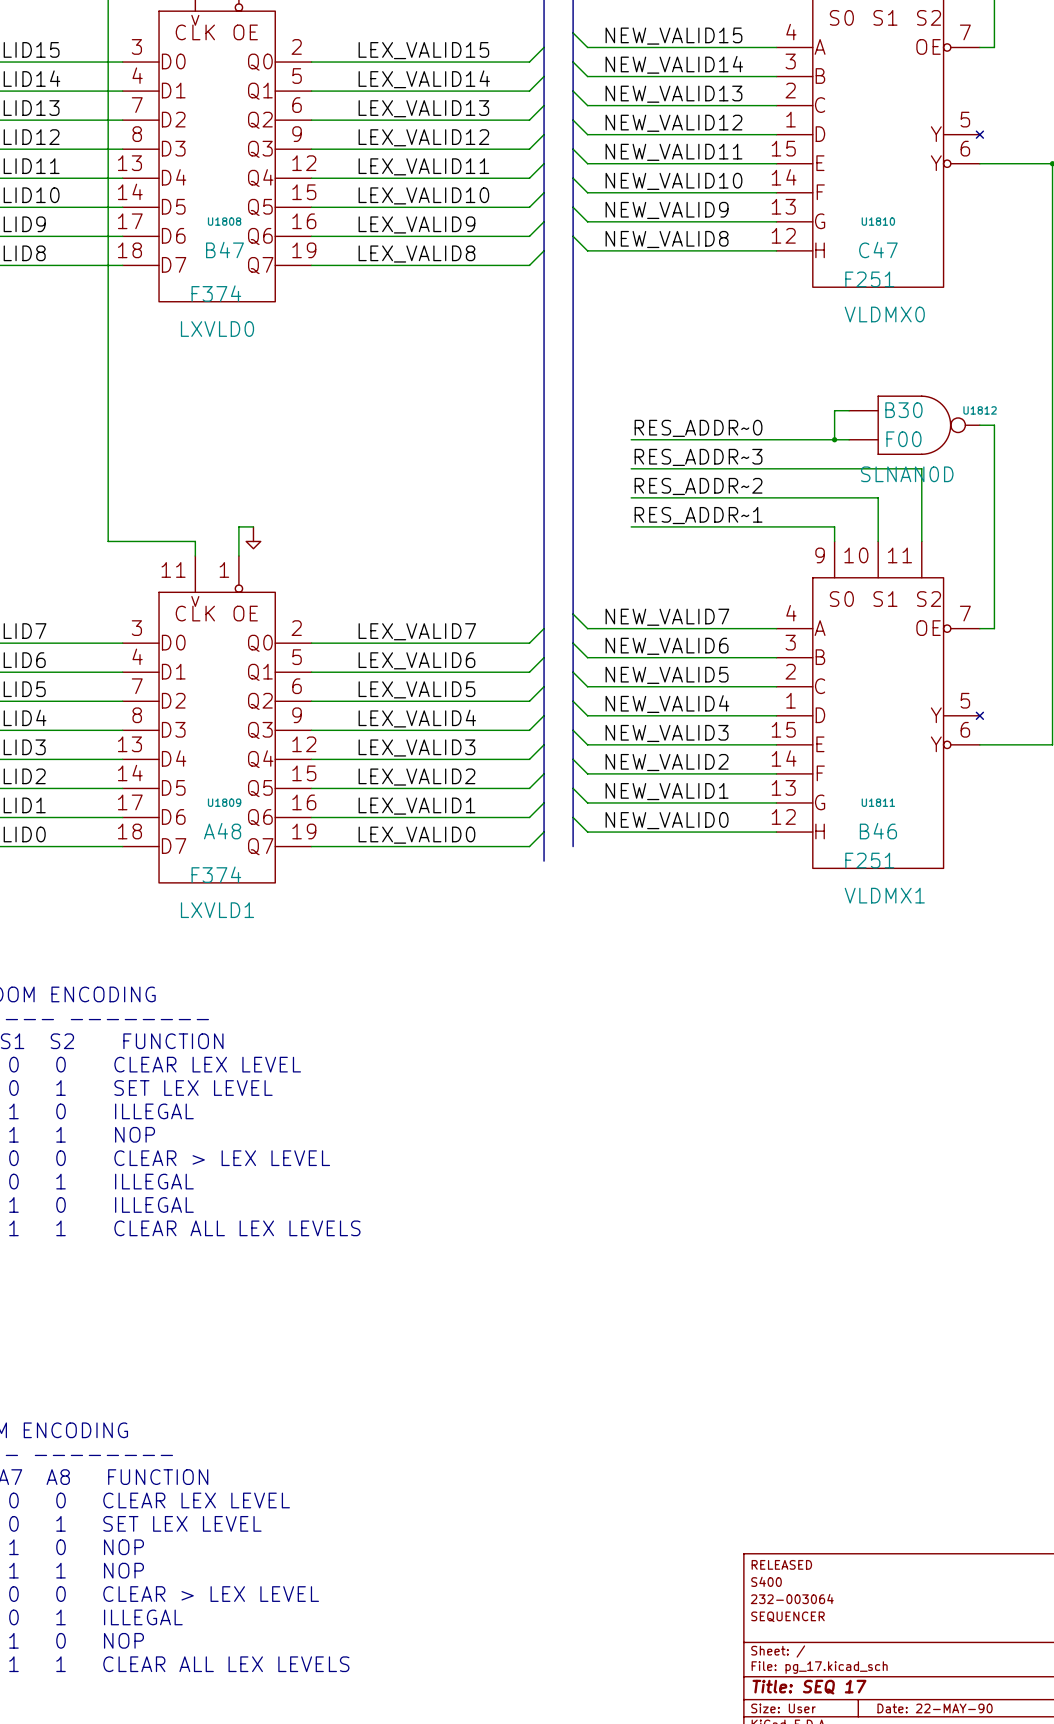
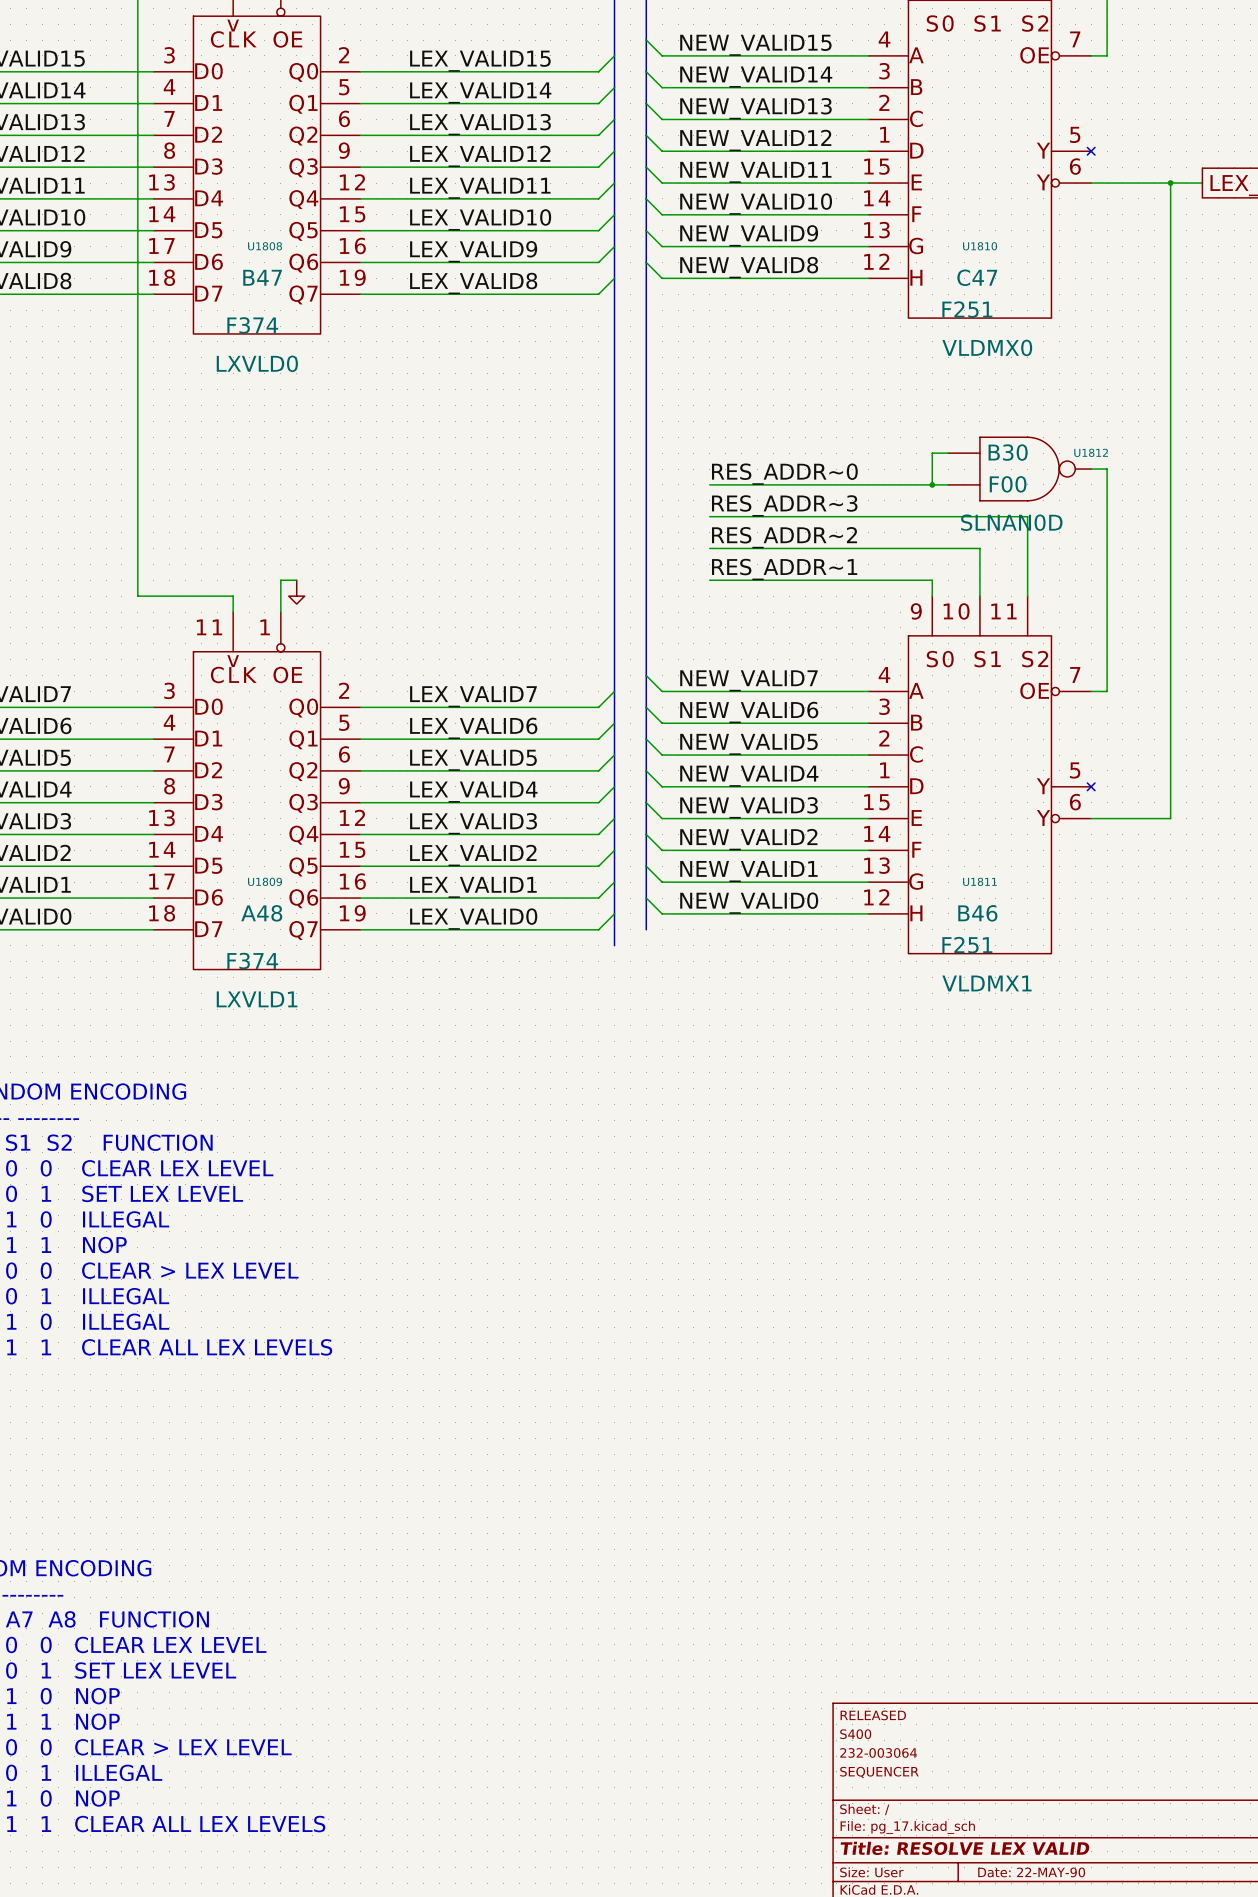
title block: Title: SEQ 17 (809, 1687) -> Title: RESOLVE LEX VALID (965, 1848)

